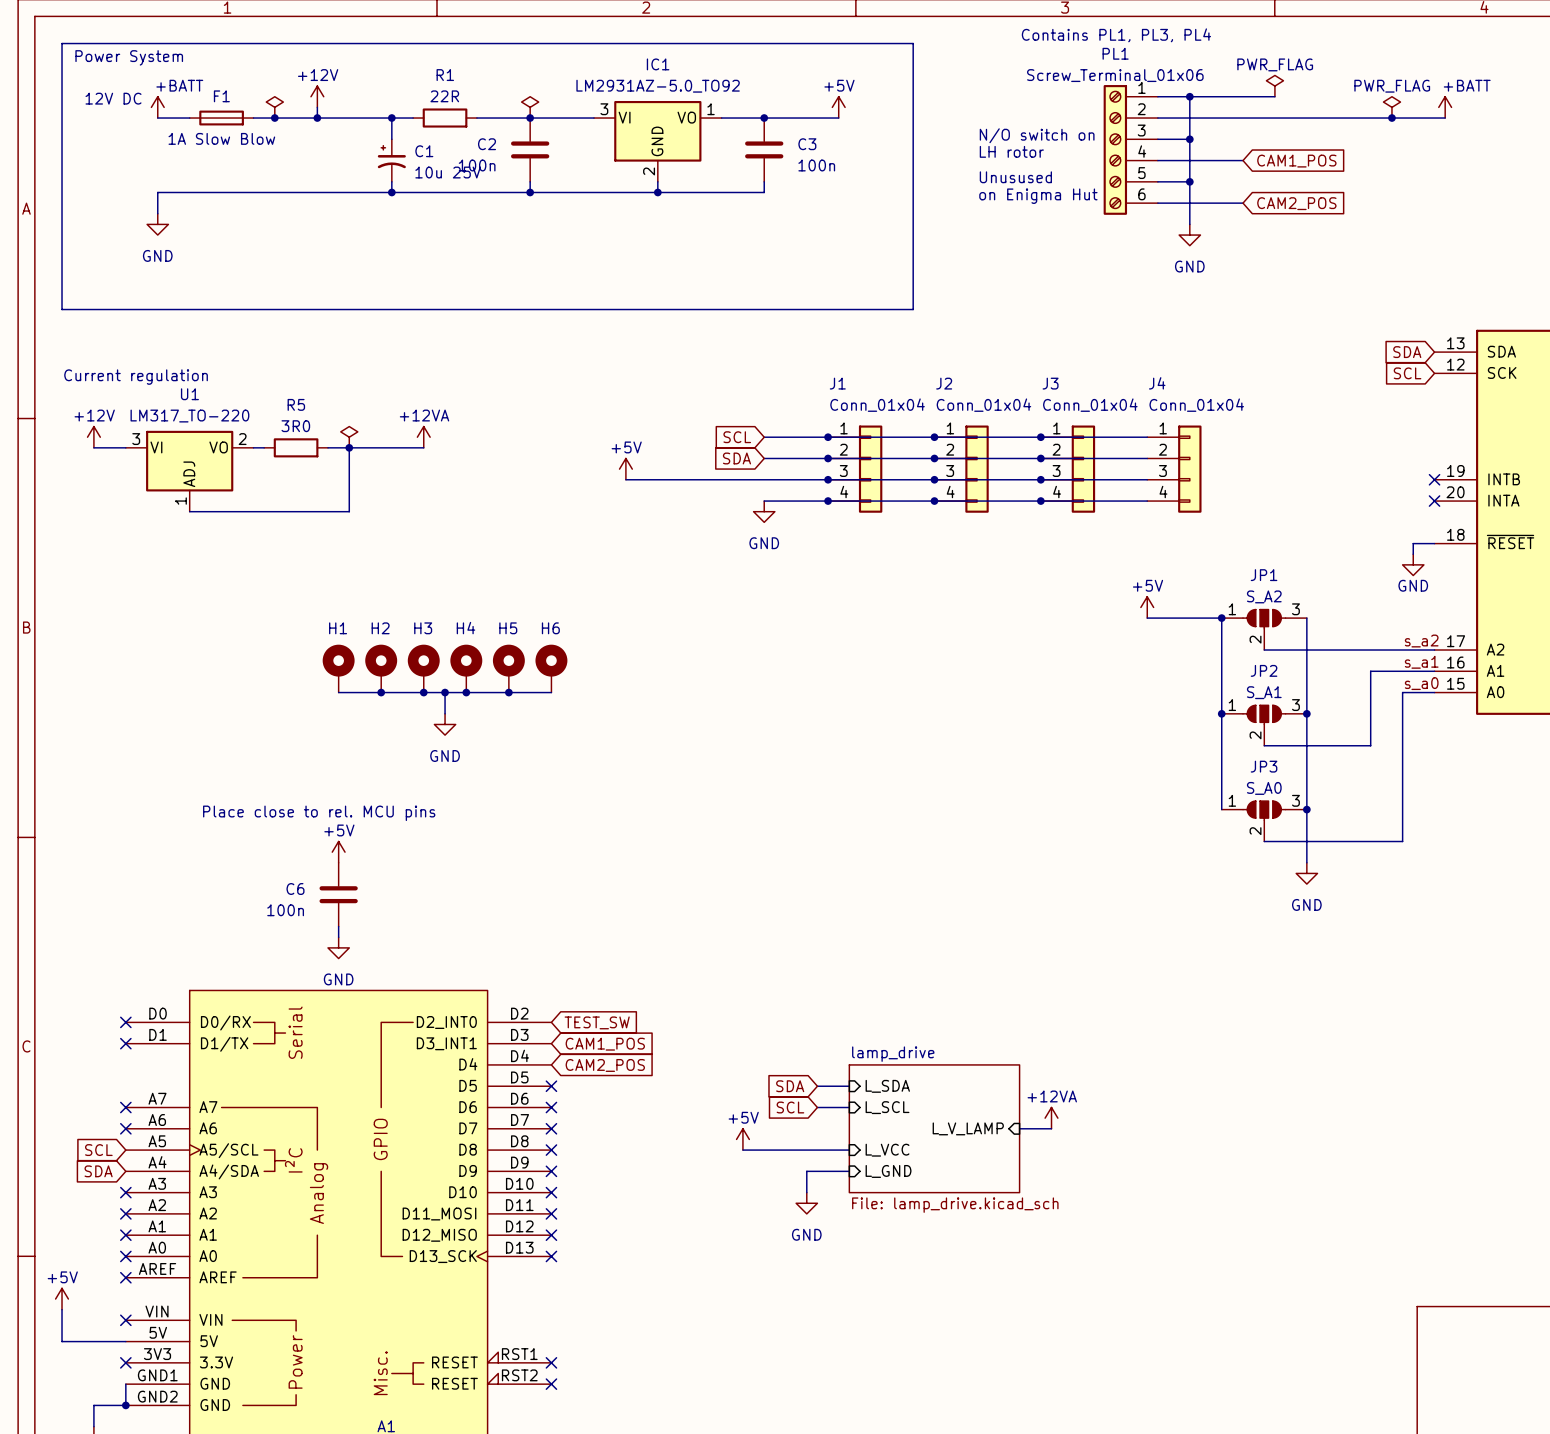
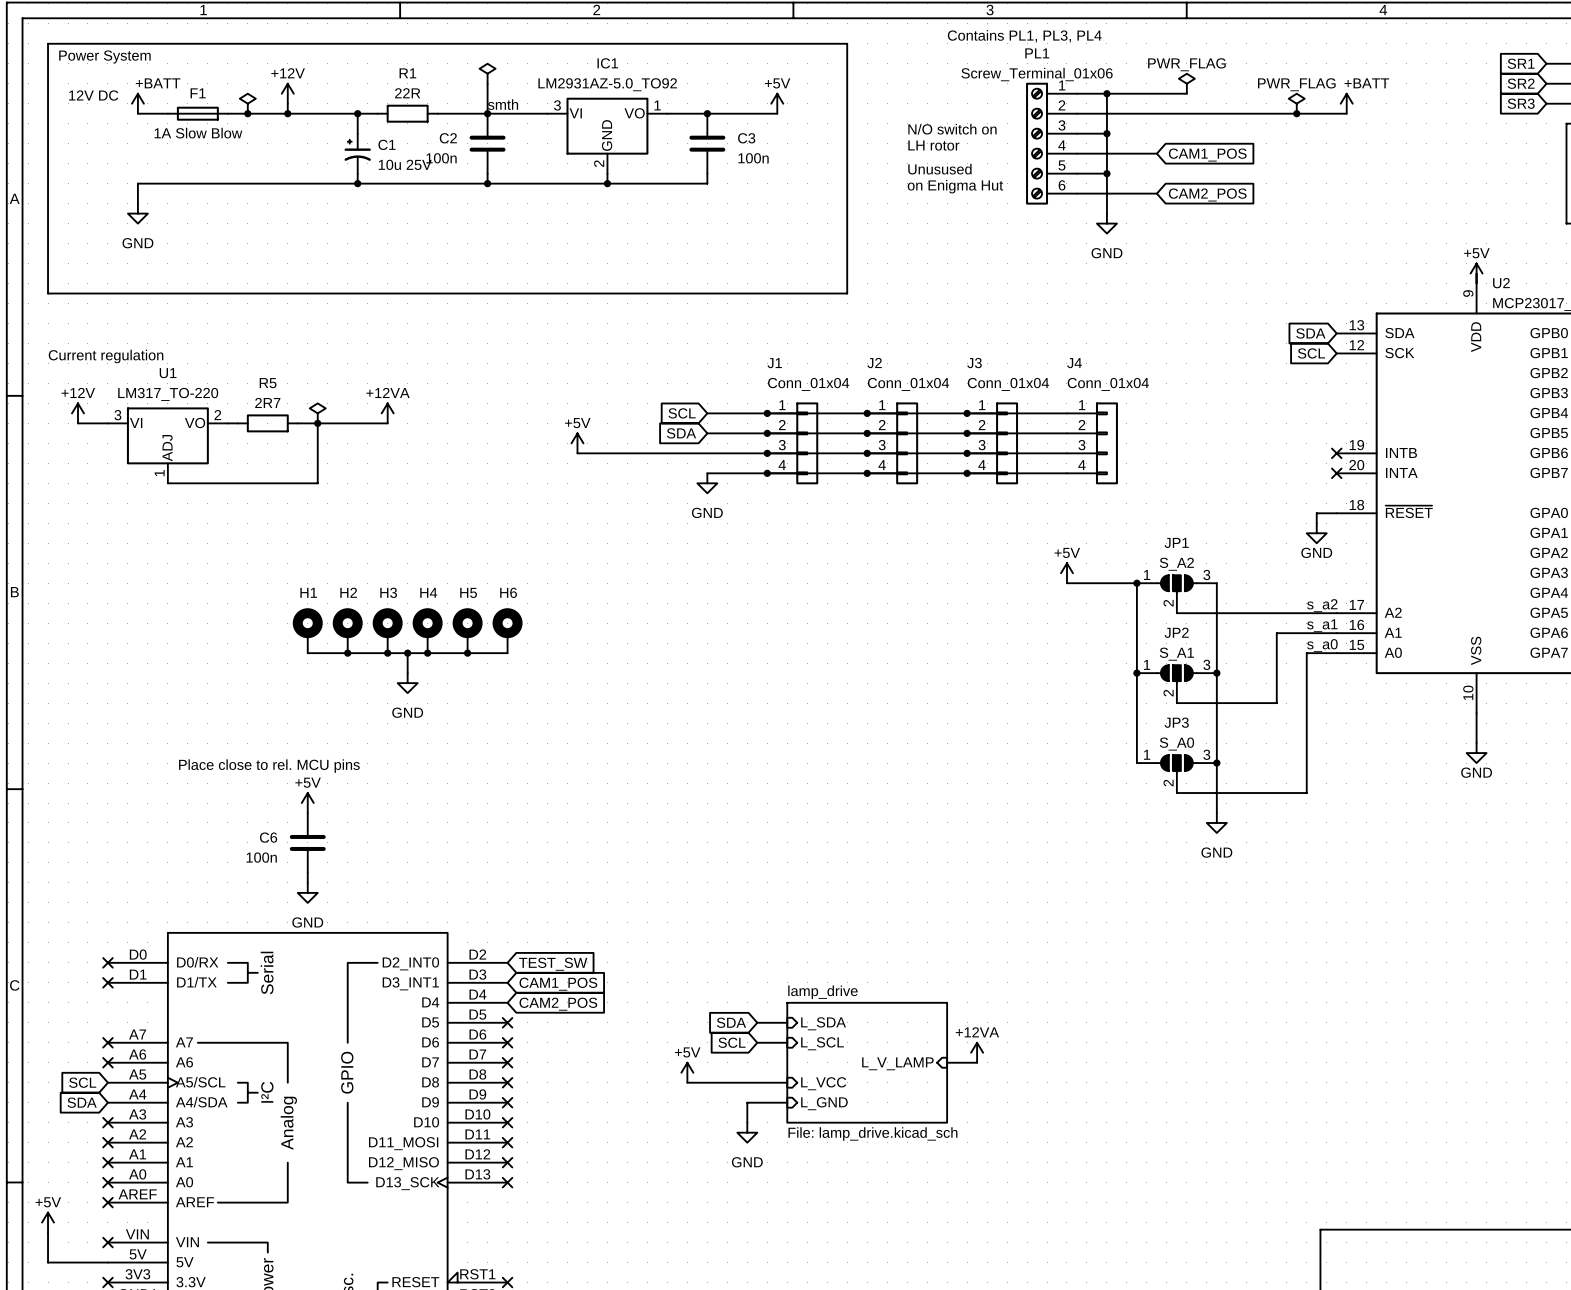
wire: none -> (487, 83) (487, 113)
power symbol position: (530, 107) -> (487, 73)
label: none -> smth (503, 104)
R5 value: 3R0 (295, 426) -> 2R7 (267, 402)

